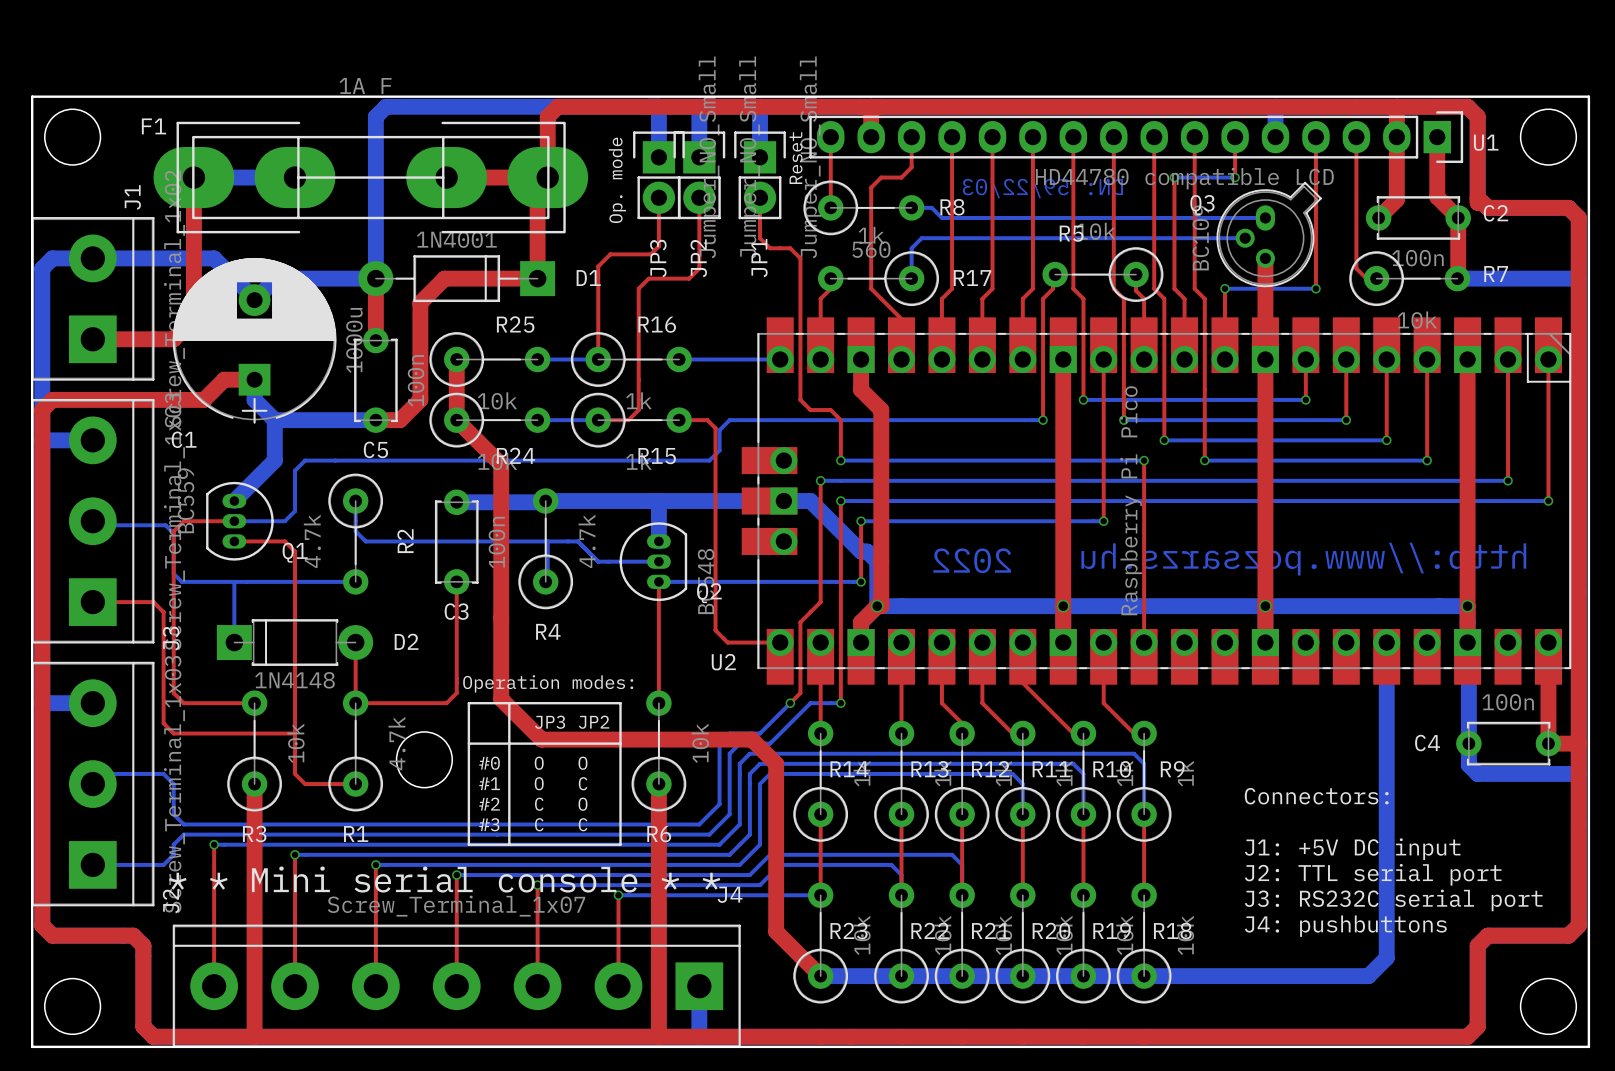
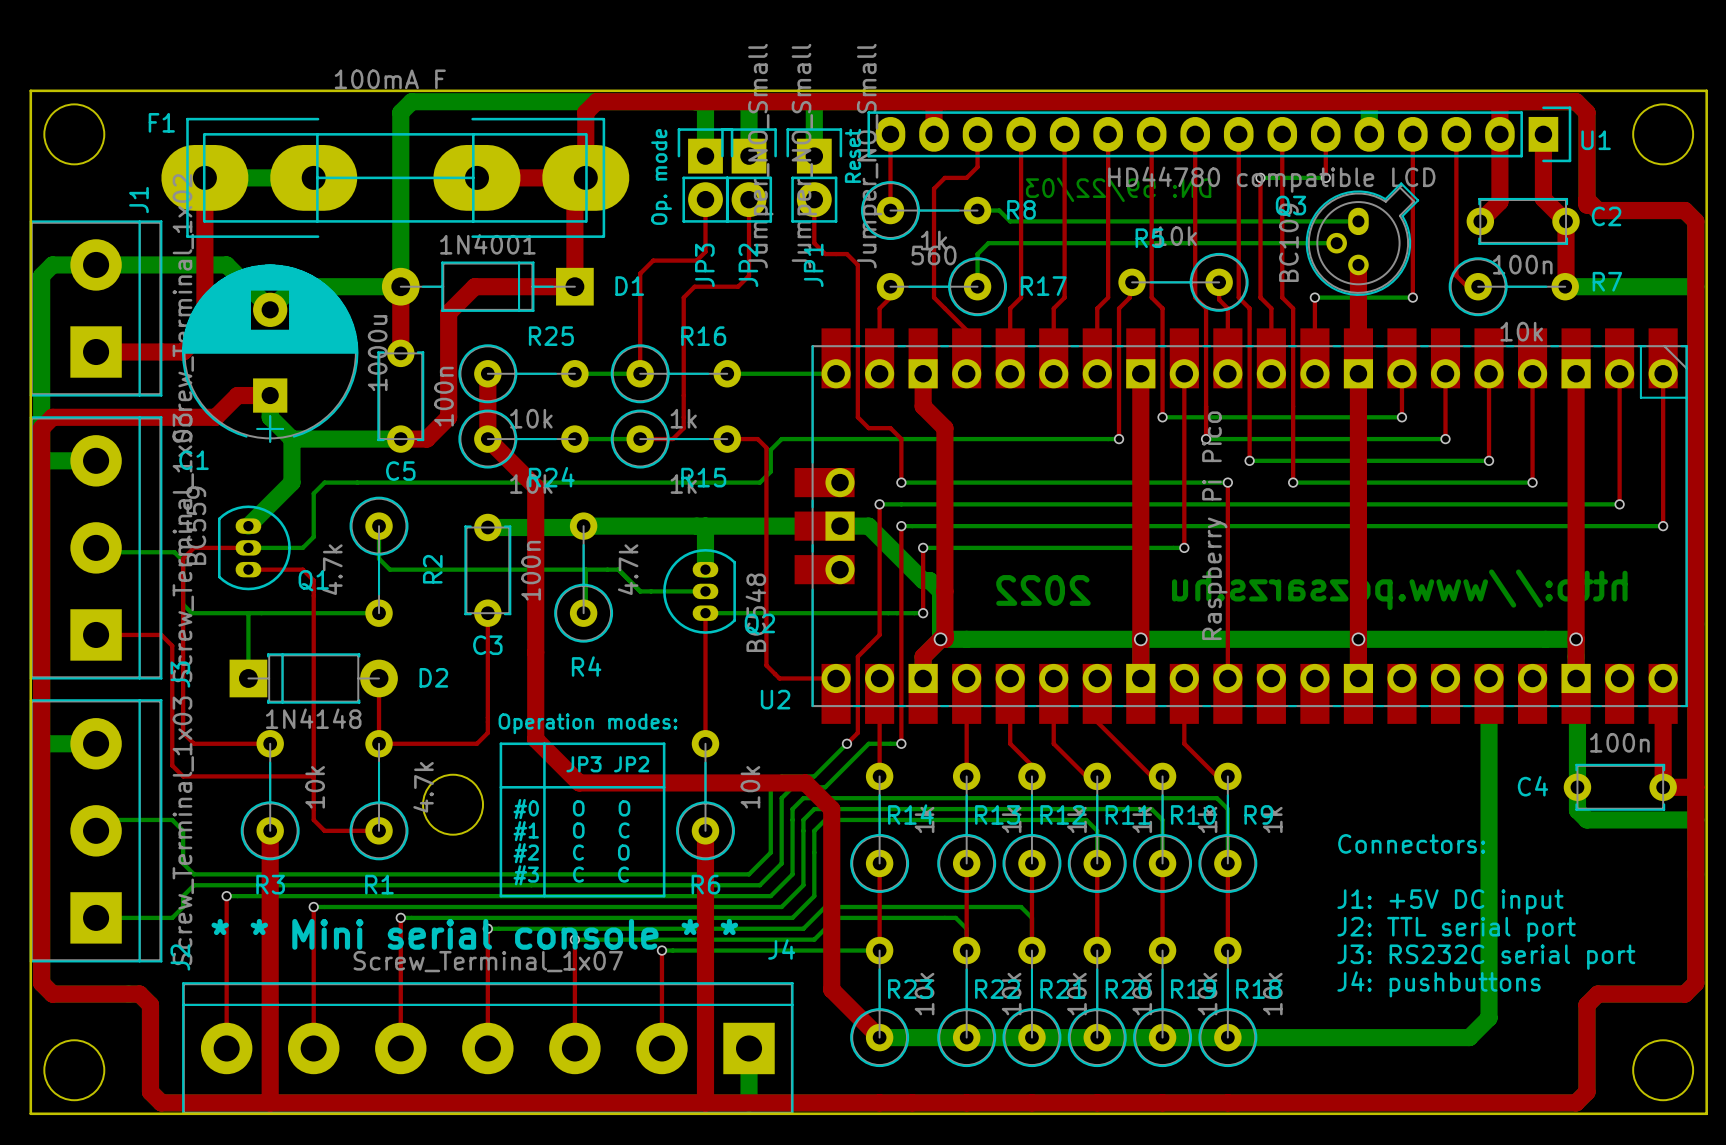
F1 value: 1A F (365, 85) -> 100mA F (390, 79)

